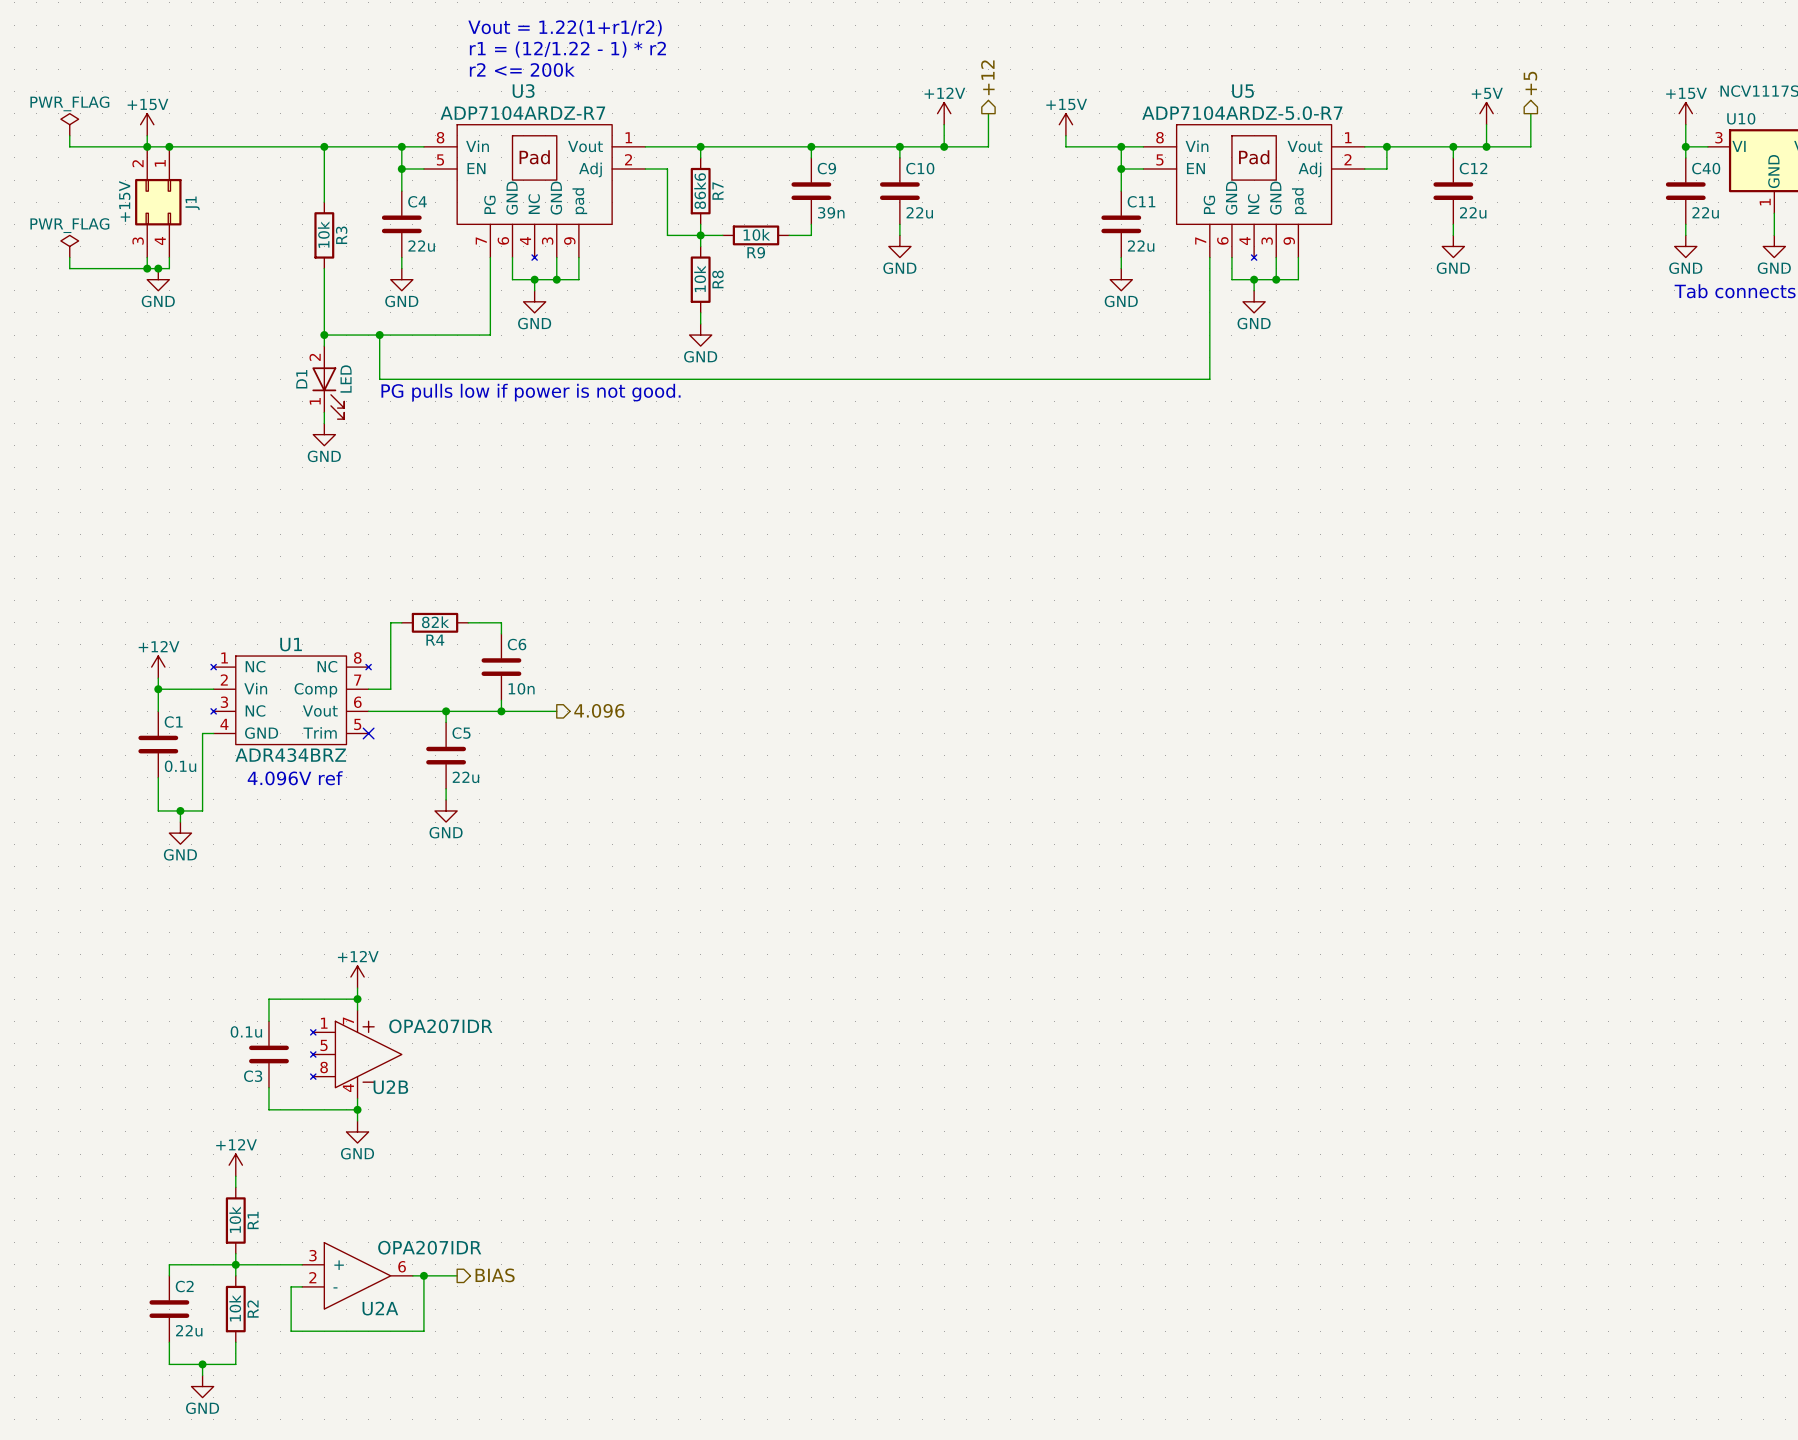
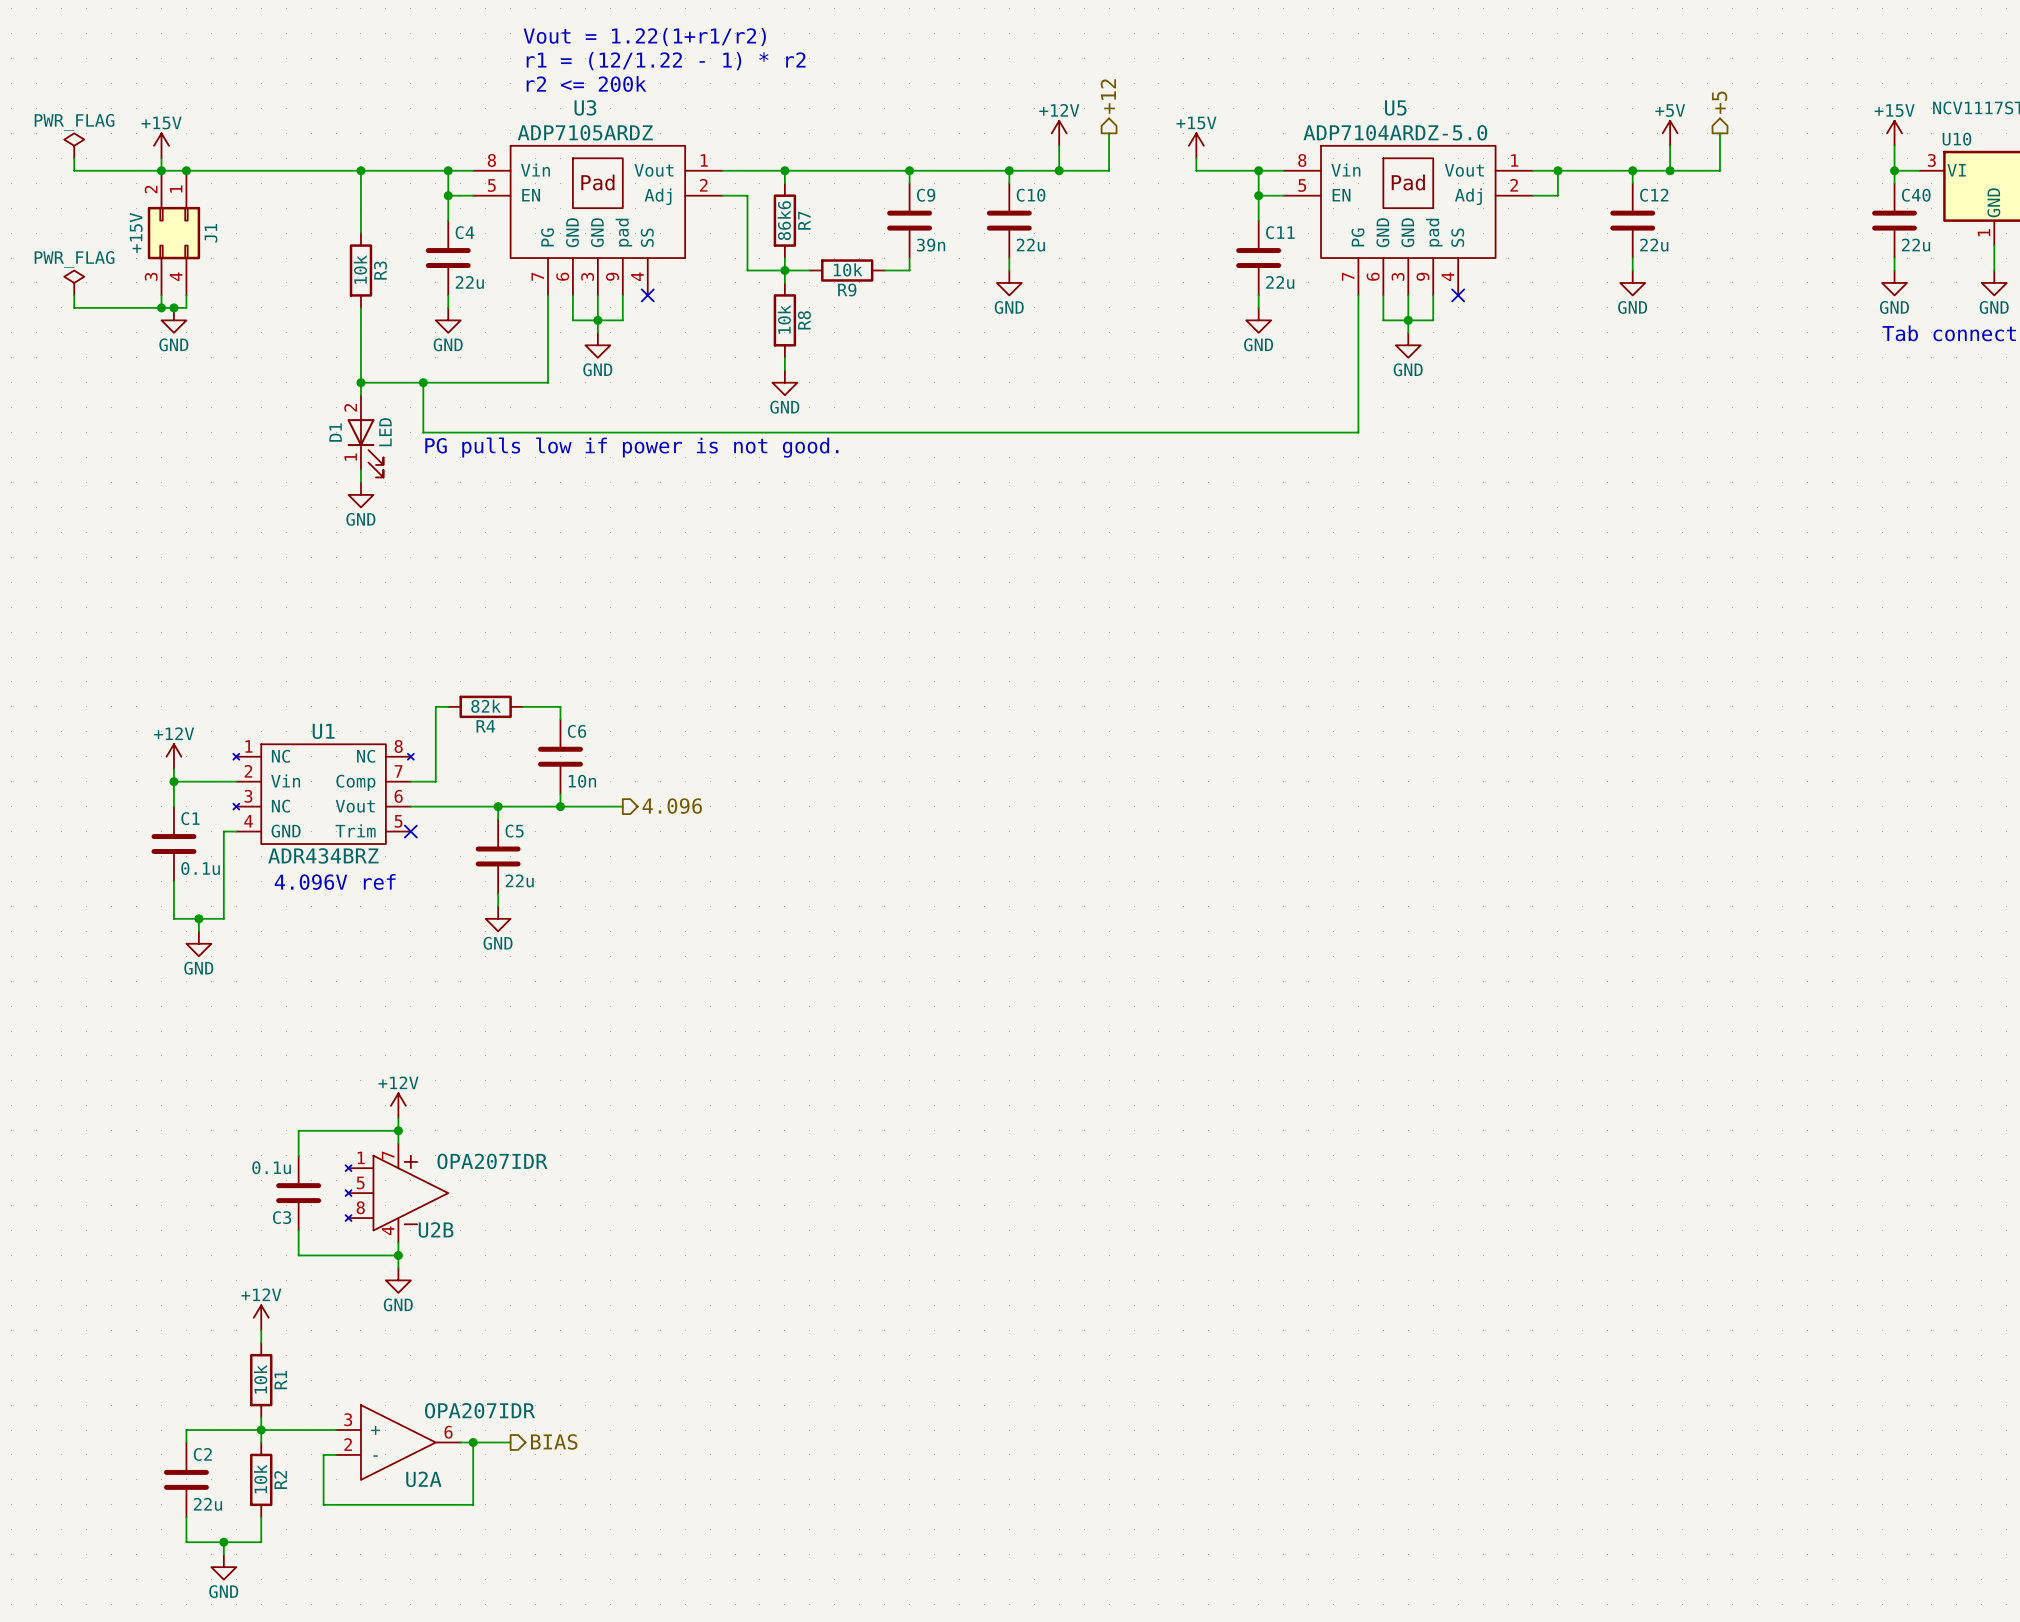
U3 value: ADP7104ARDZ-R7 (522, 113) -> ADP7105ARDZ (585, 132)
U5 value: ADP7104ARDZ-5.0-R7 (1242, 113) -> ADP7104ARDZ-5.0 (1395, 132)
U3 symbol: [423, 124, 646, 261] -> [473, 145, 723, 296]
U5 symbol: [1143, 124, 1365, 261] -> [1283, 145, 1533, 296]
wire: none -> (597, 295) (597, 320)
wire: (578, 257) (578, 279) (556, 279) -> none
no-connect mark: none -> (647, 295)
wire: none -> (1408, 295) (1408, 320)
wire: (1298, 257) (1298, 279) (1276, 279) -> none
no-connect mark: none -> (1458, 295)
junction: (556, 279) -> none
junction: (1276, 279) -> none

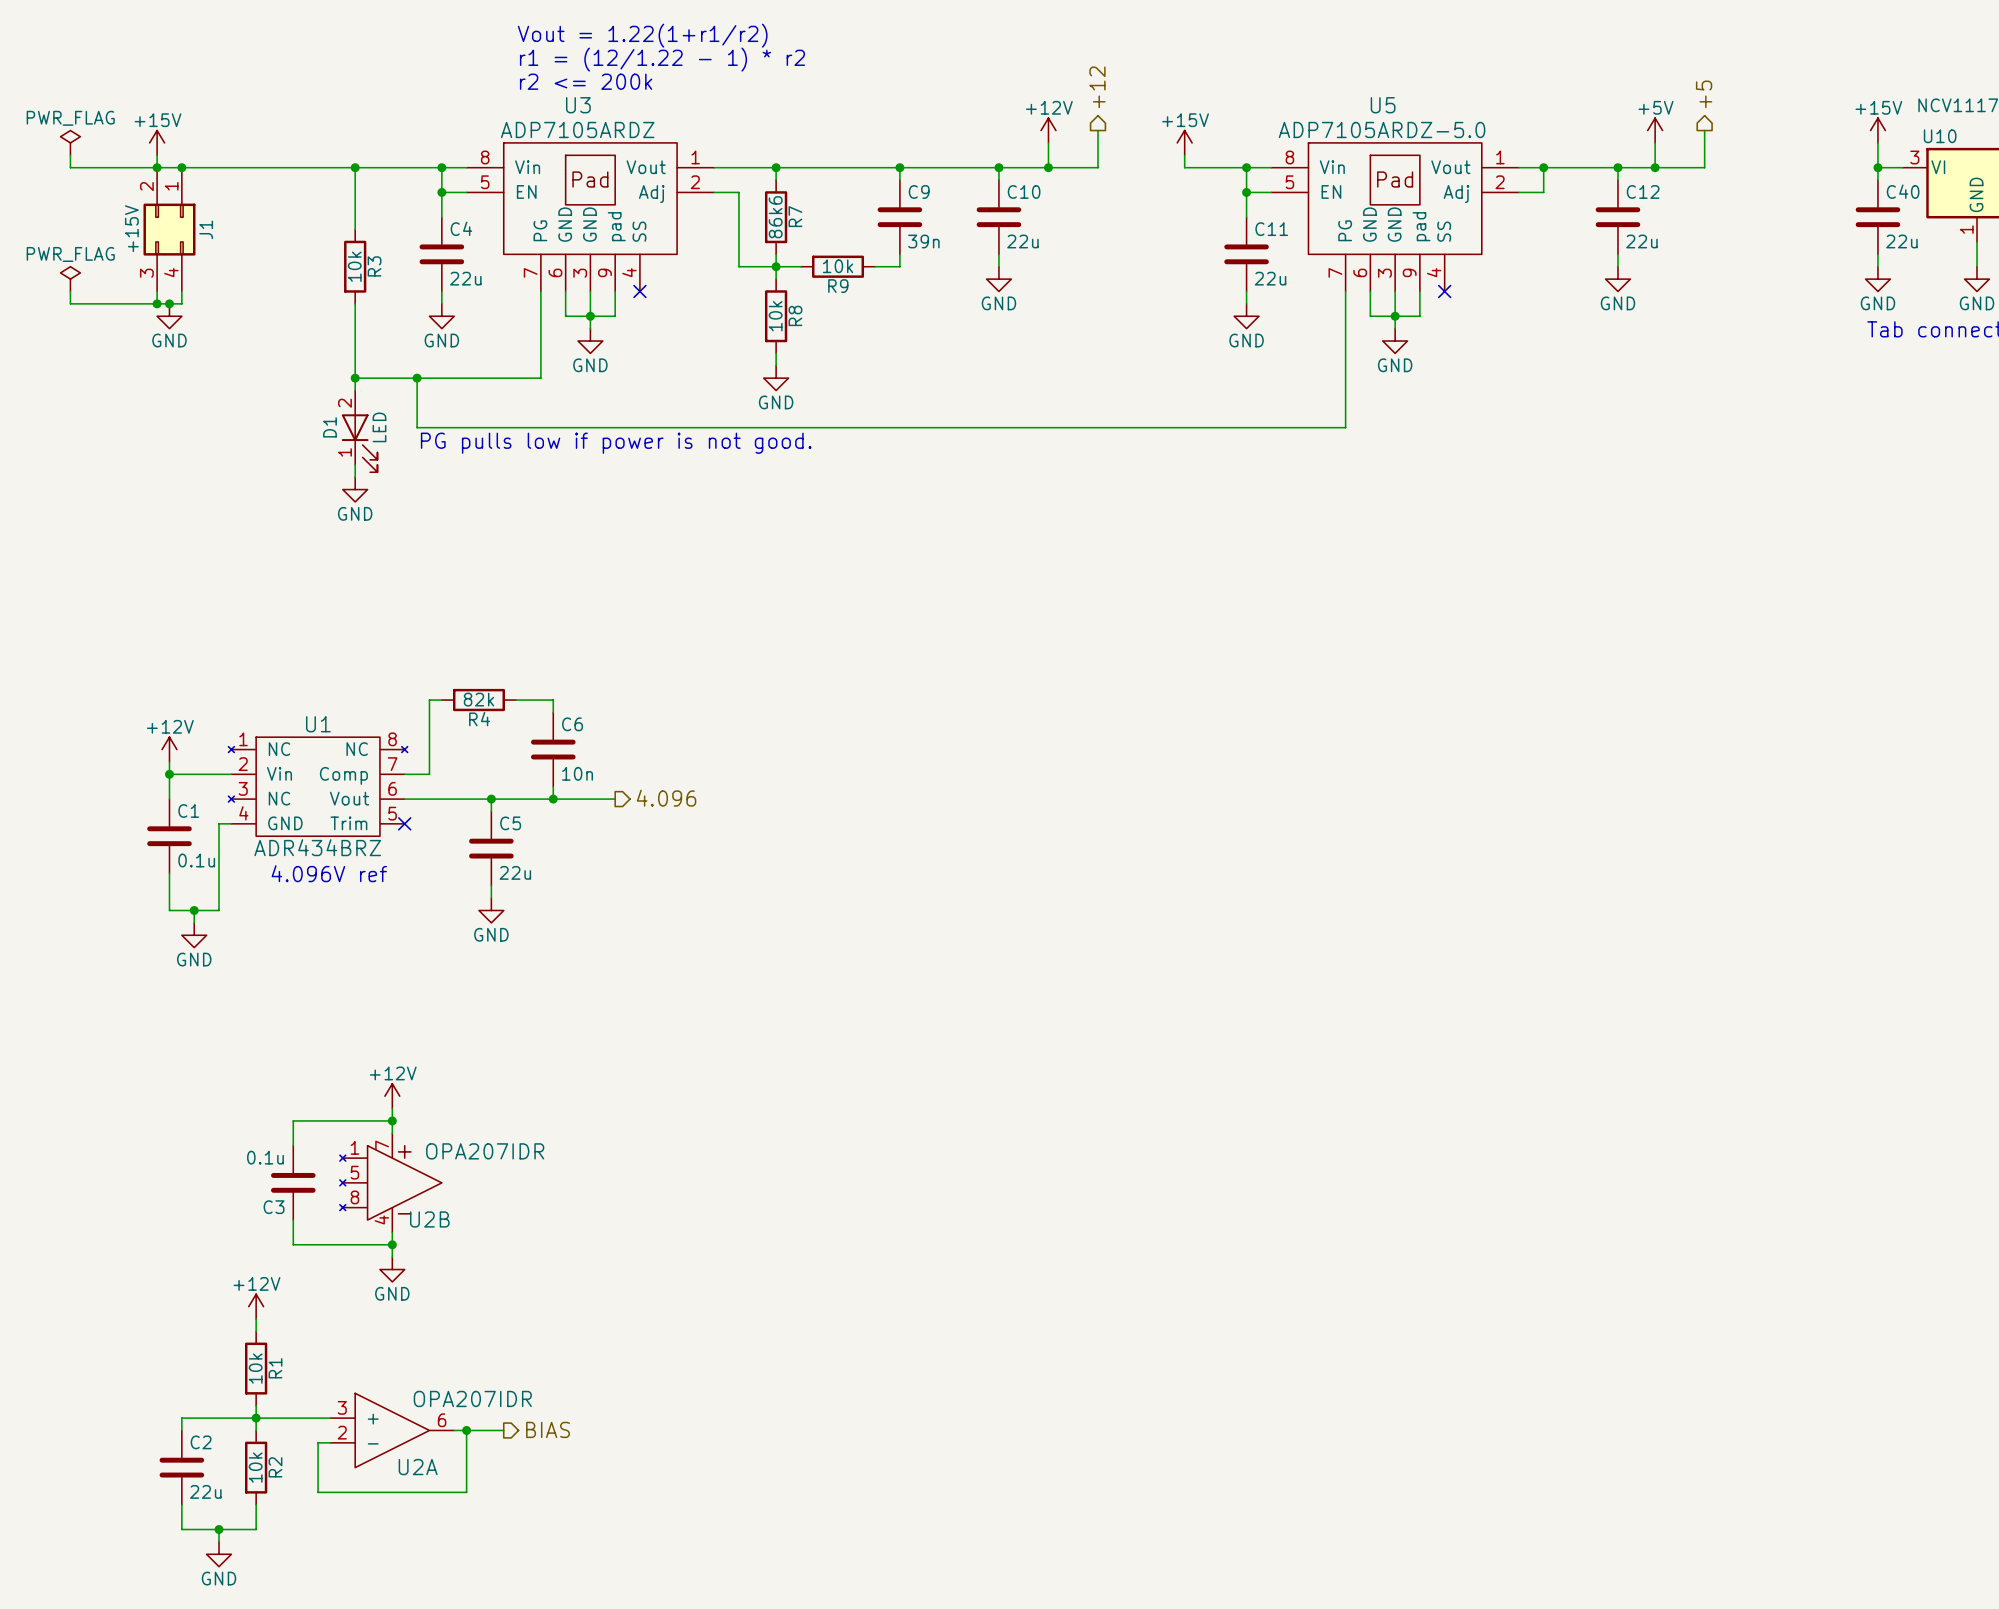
U5 value: ADP7104ARDZ-5.0 (1395, 132) -> ADP7105ARDZ-5.0 (1382, 129)

